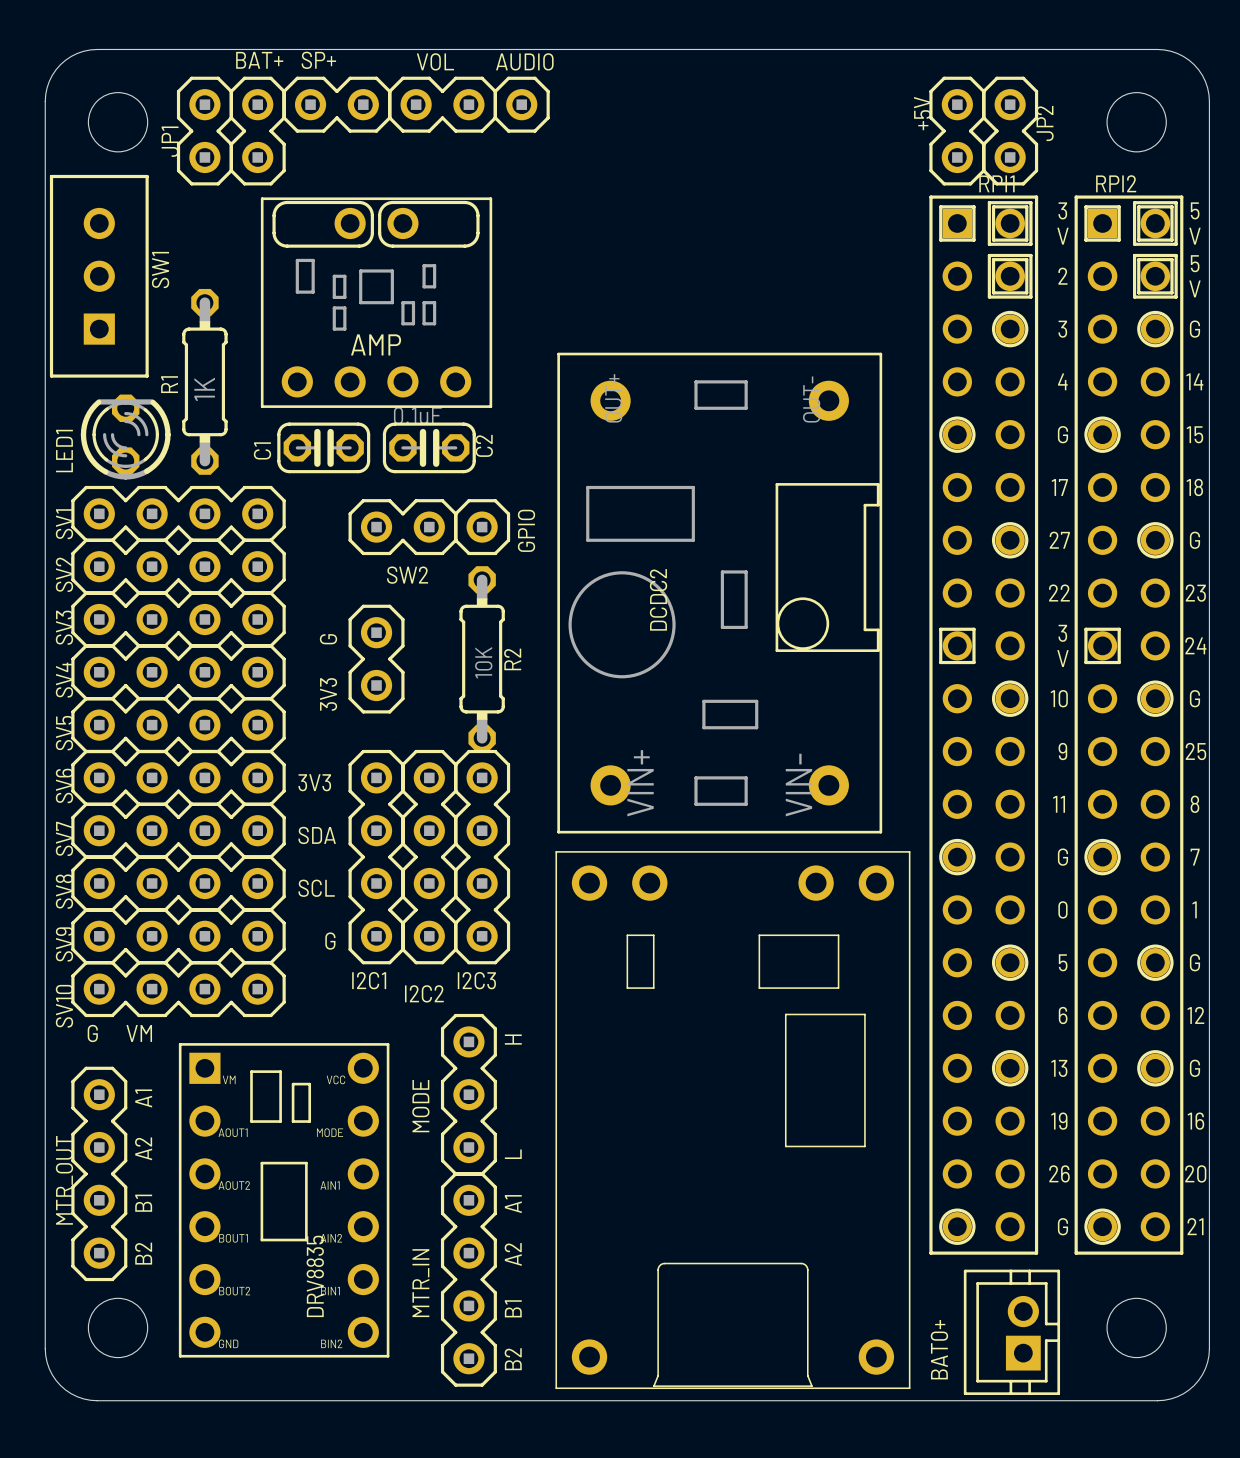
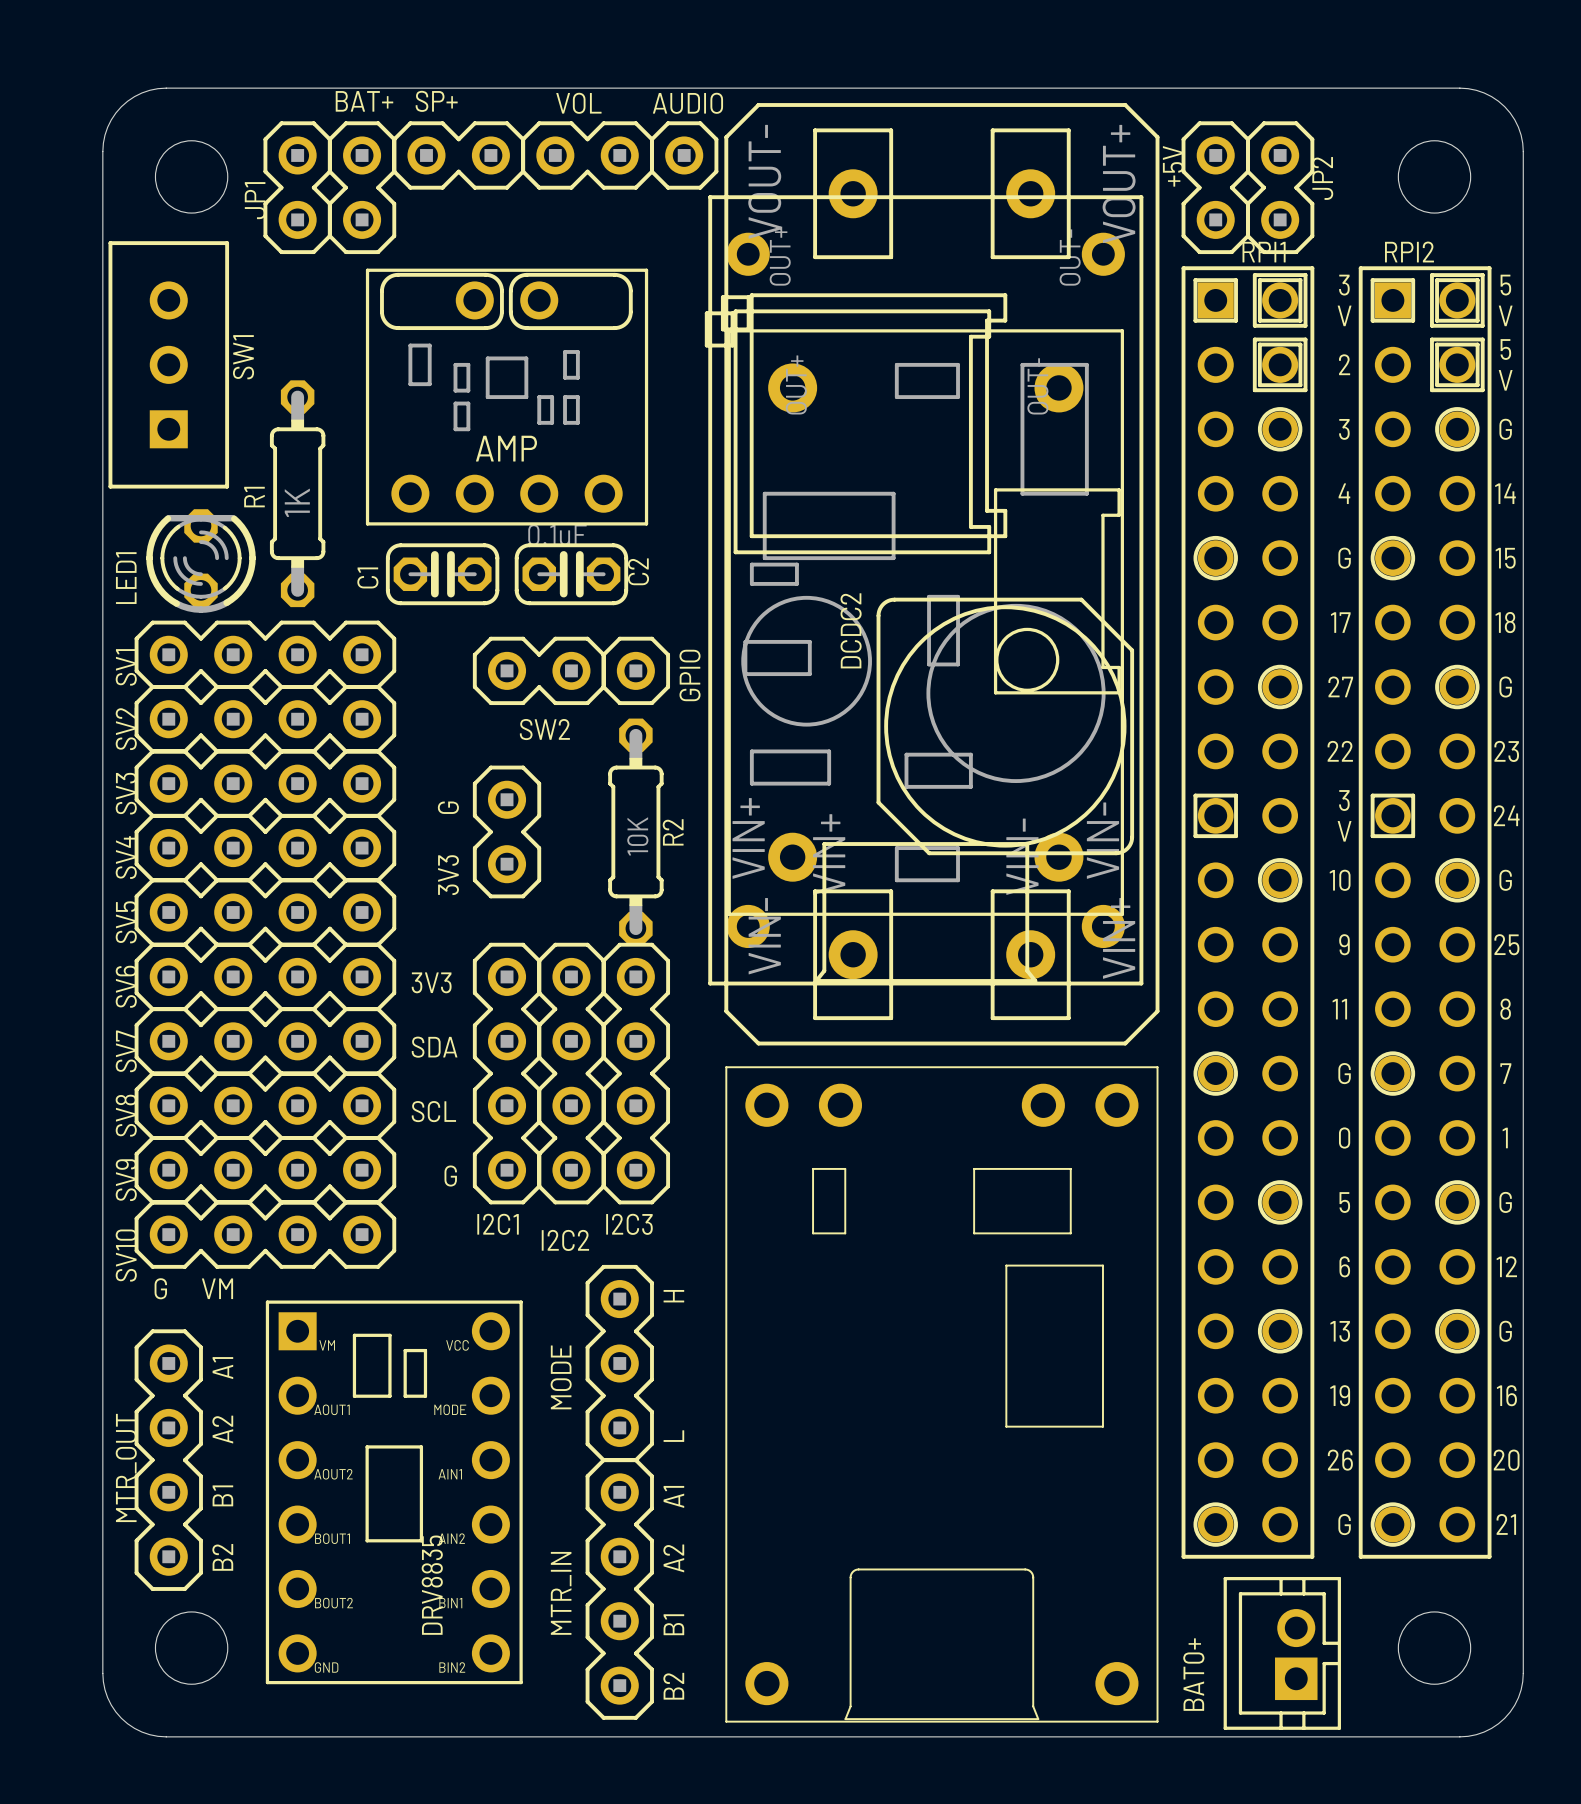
part: none -> (940, 574)
part: none -> (924, 590)
DCDC2 position: (719, 593) -> (925, 622)

